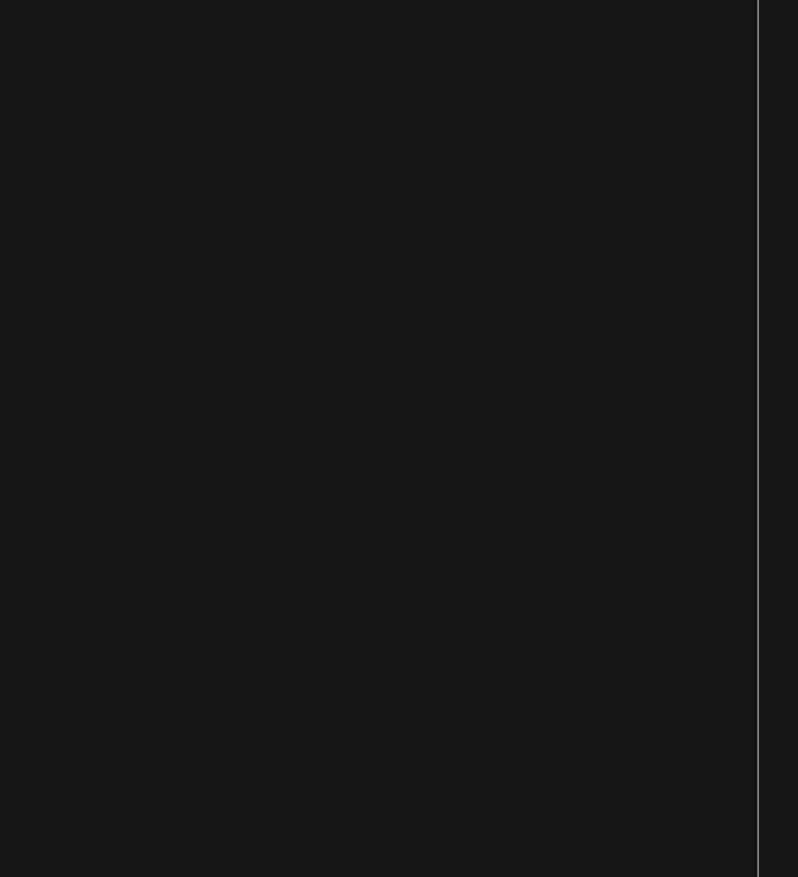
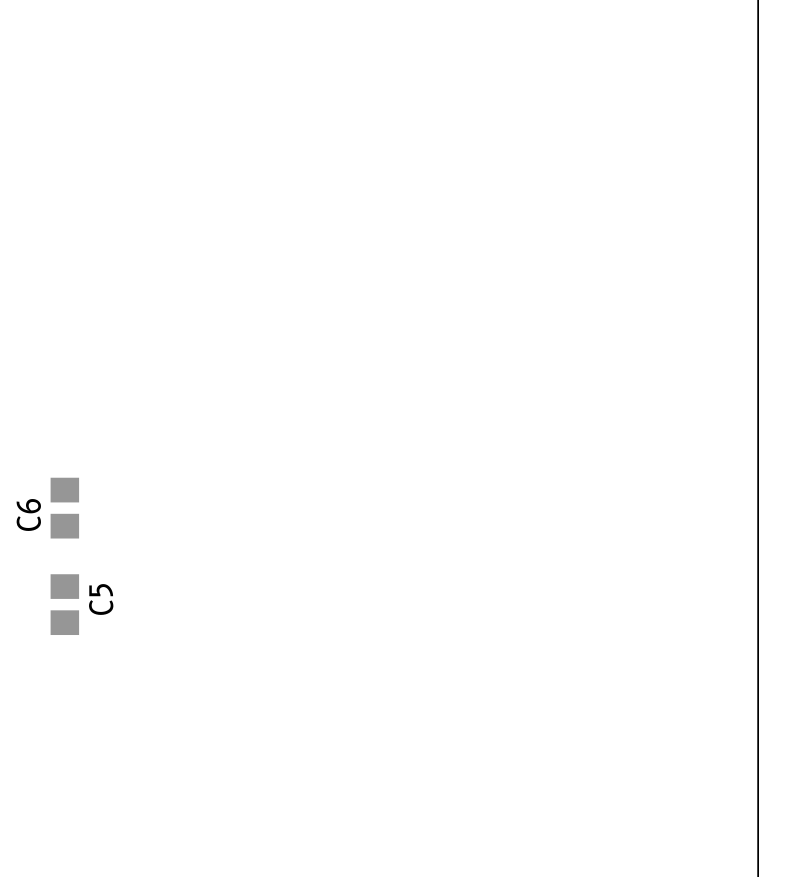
C6: none -> (64, 508)
C5: none -> (64, 604)

